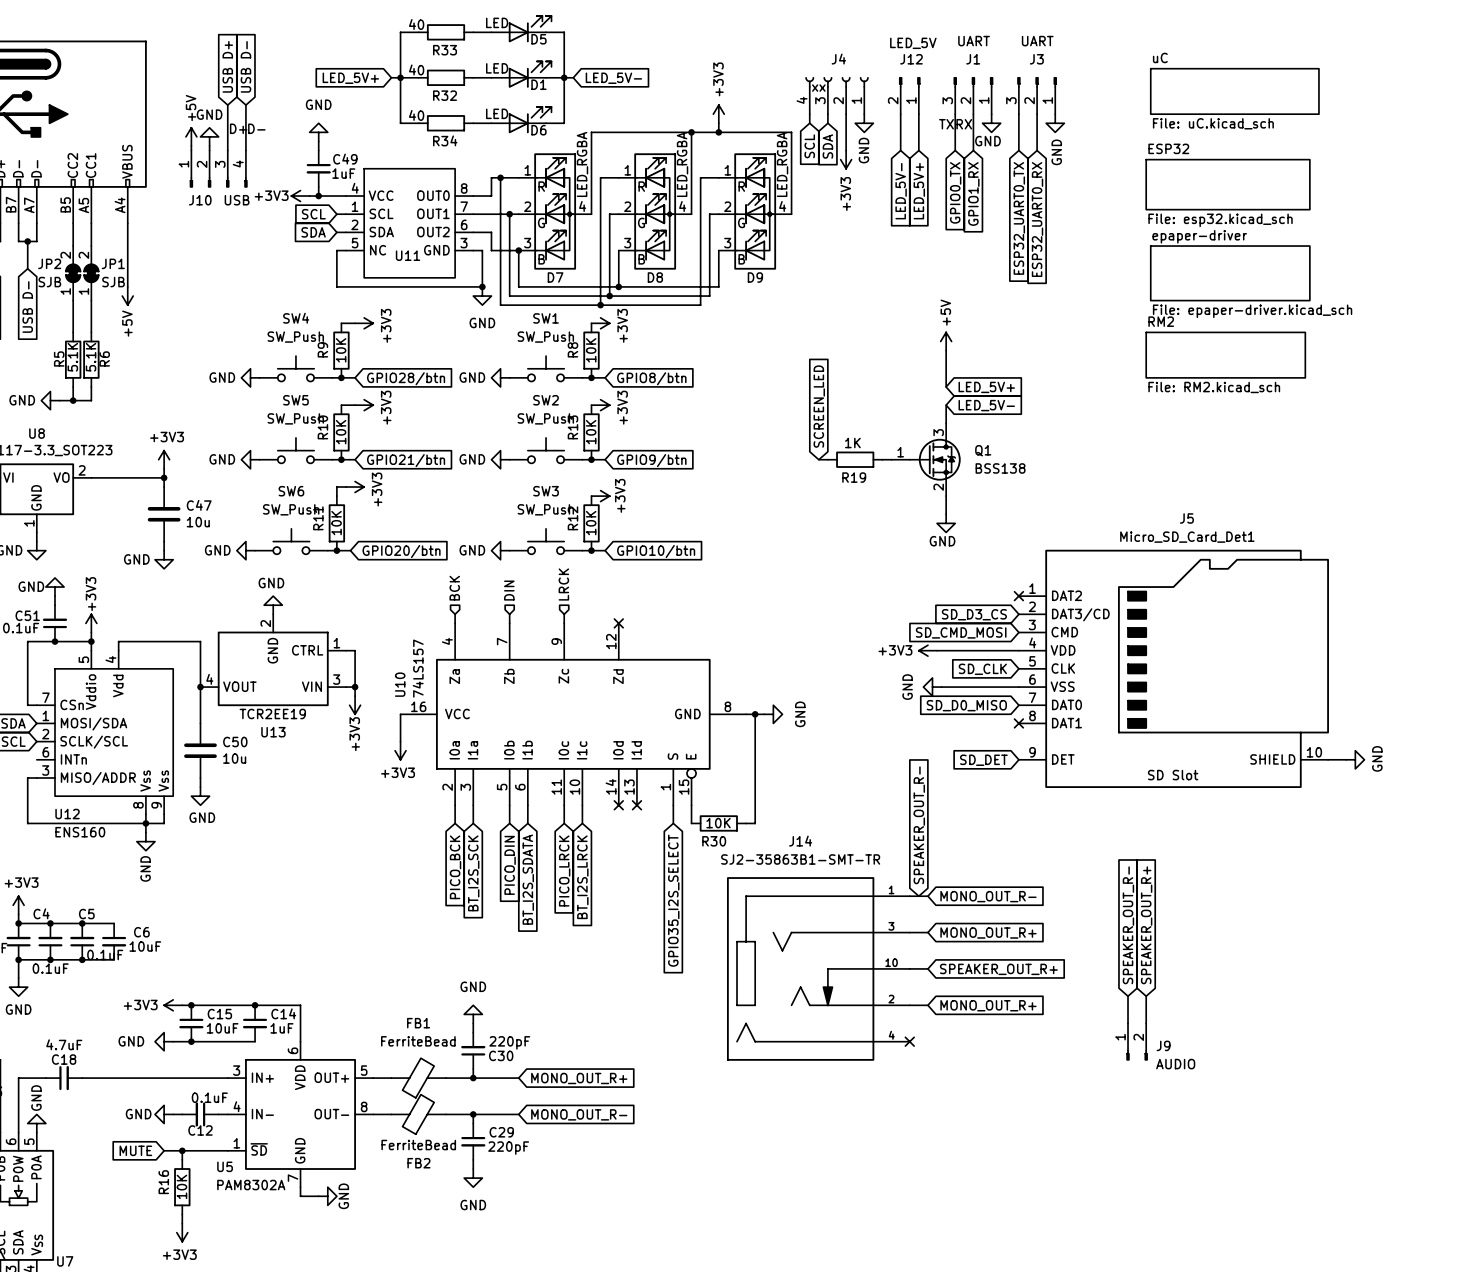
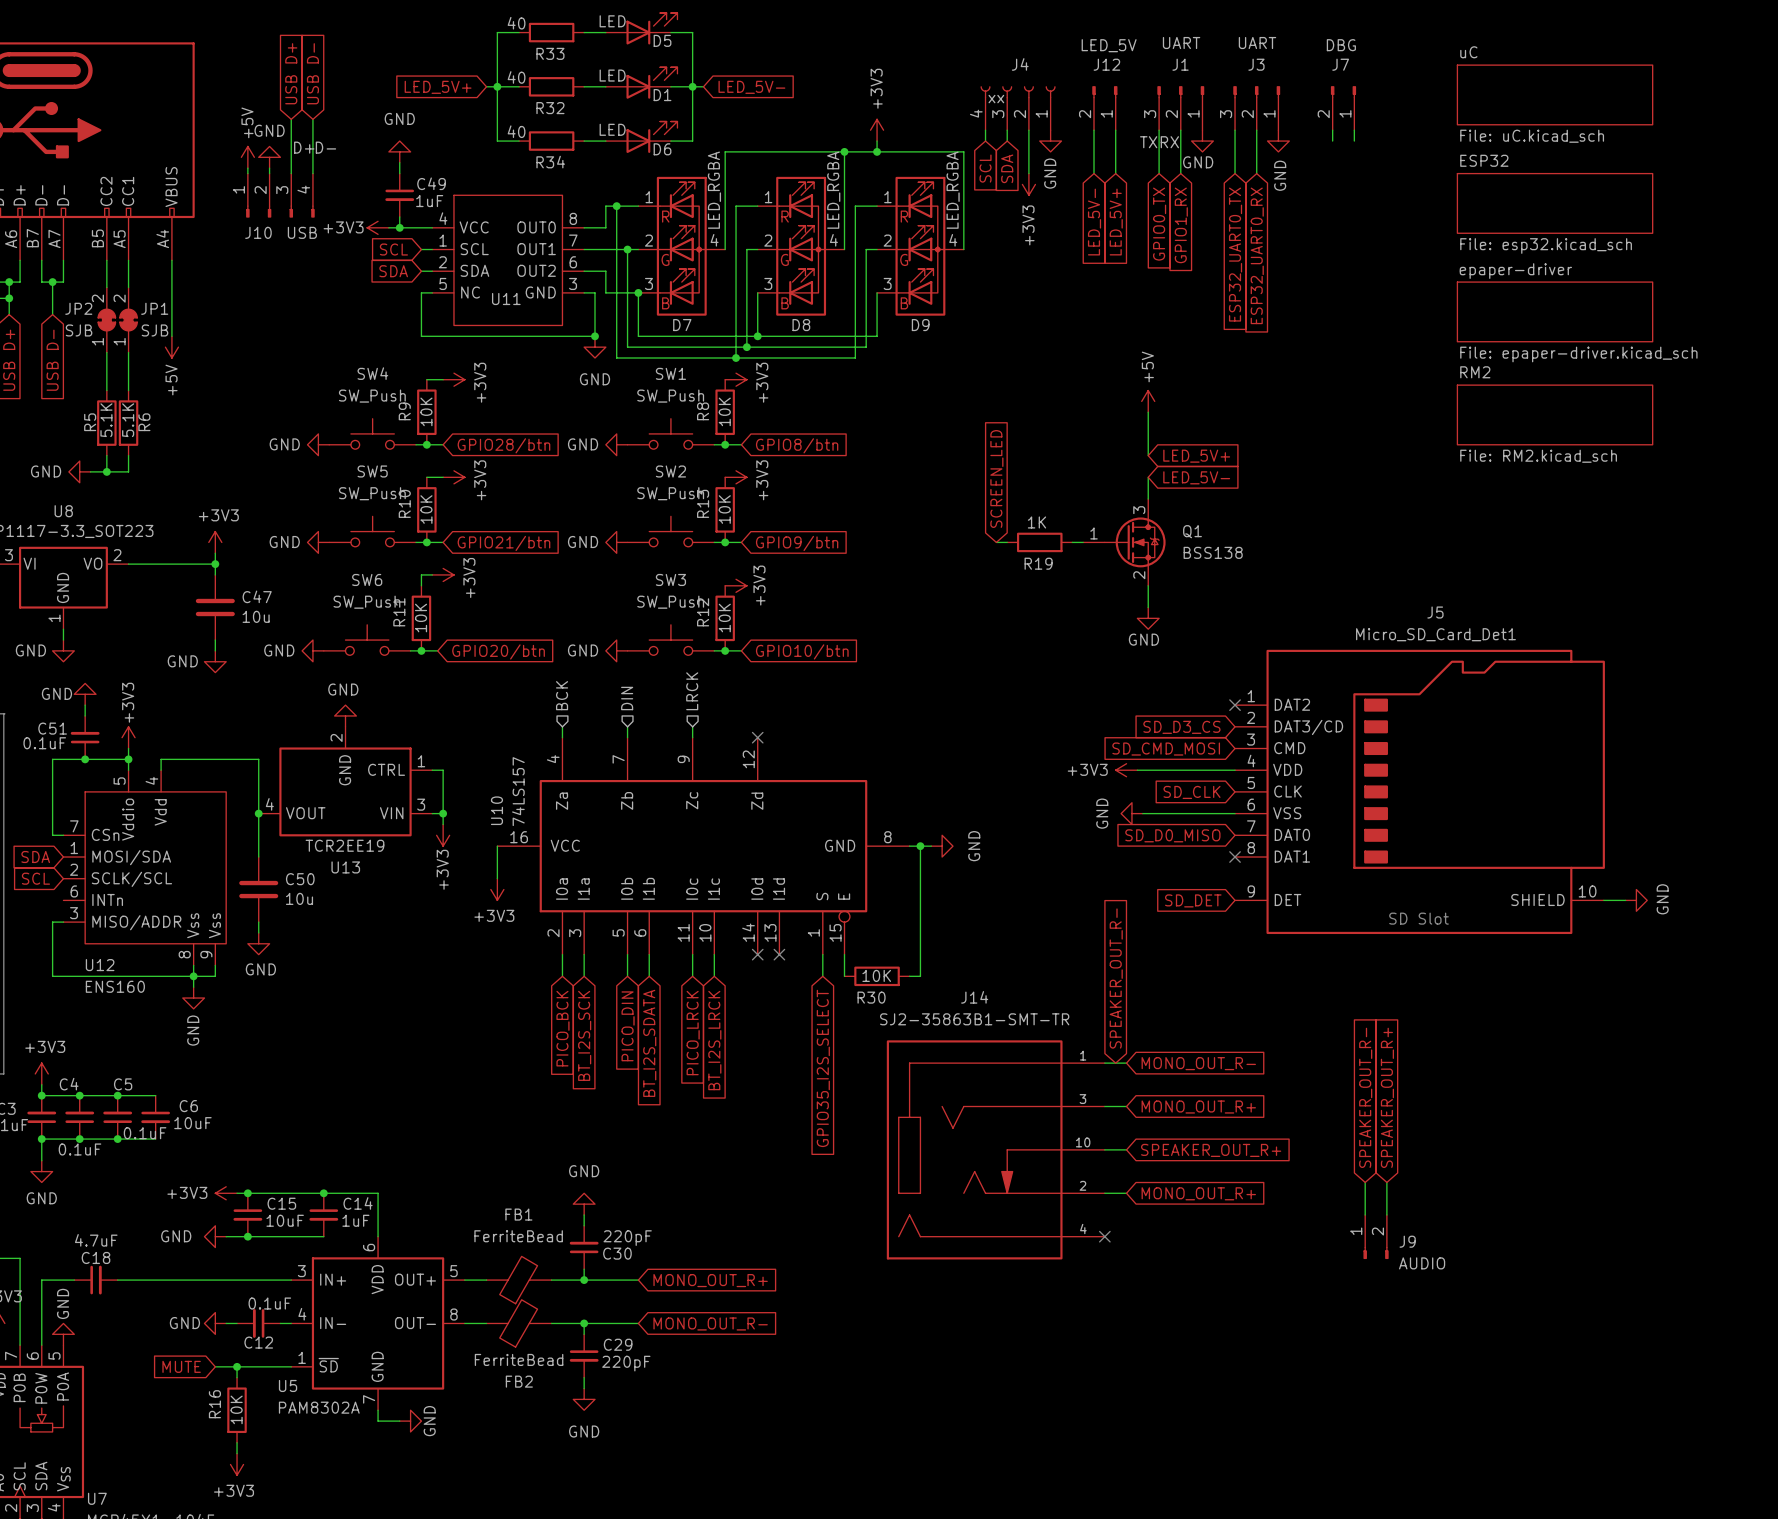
sheet uC: none -> File: uC.kicad_sch (1555, 94)
sheet uC: File: uC.kicad_sch (1234, 91) -> none
J7: none -> DBG (1343, 108)
wire: none -> (1332, 130) (1332, 141)
wire: none -> (1354, 130) (1354, 141)
sheet ESP32 position: (1228, 184) -> (1555, 203)
sheet epaper-driver: none -> File: epaper-driver.kicad_sch (1555, 311)
sheet epaper-driver: File: epaper-driver.kicad_sch (1230, 273) -> none
sheet RM2 shape: [1145, 331, 1306, 379] -> [1456, 384, 1654, 446]

